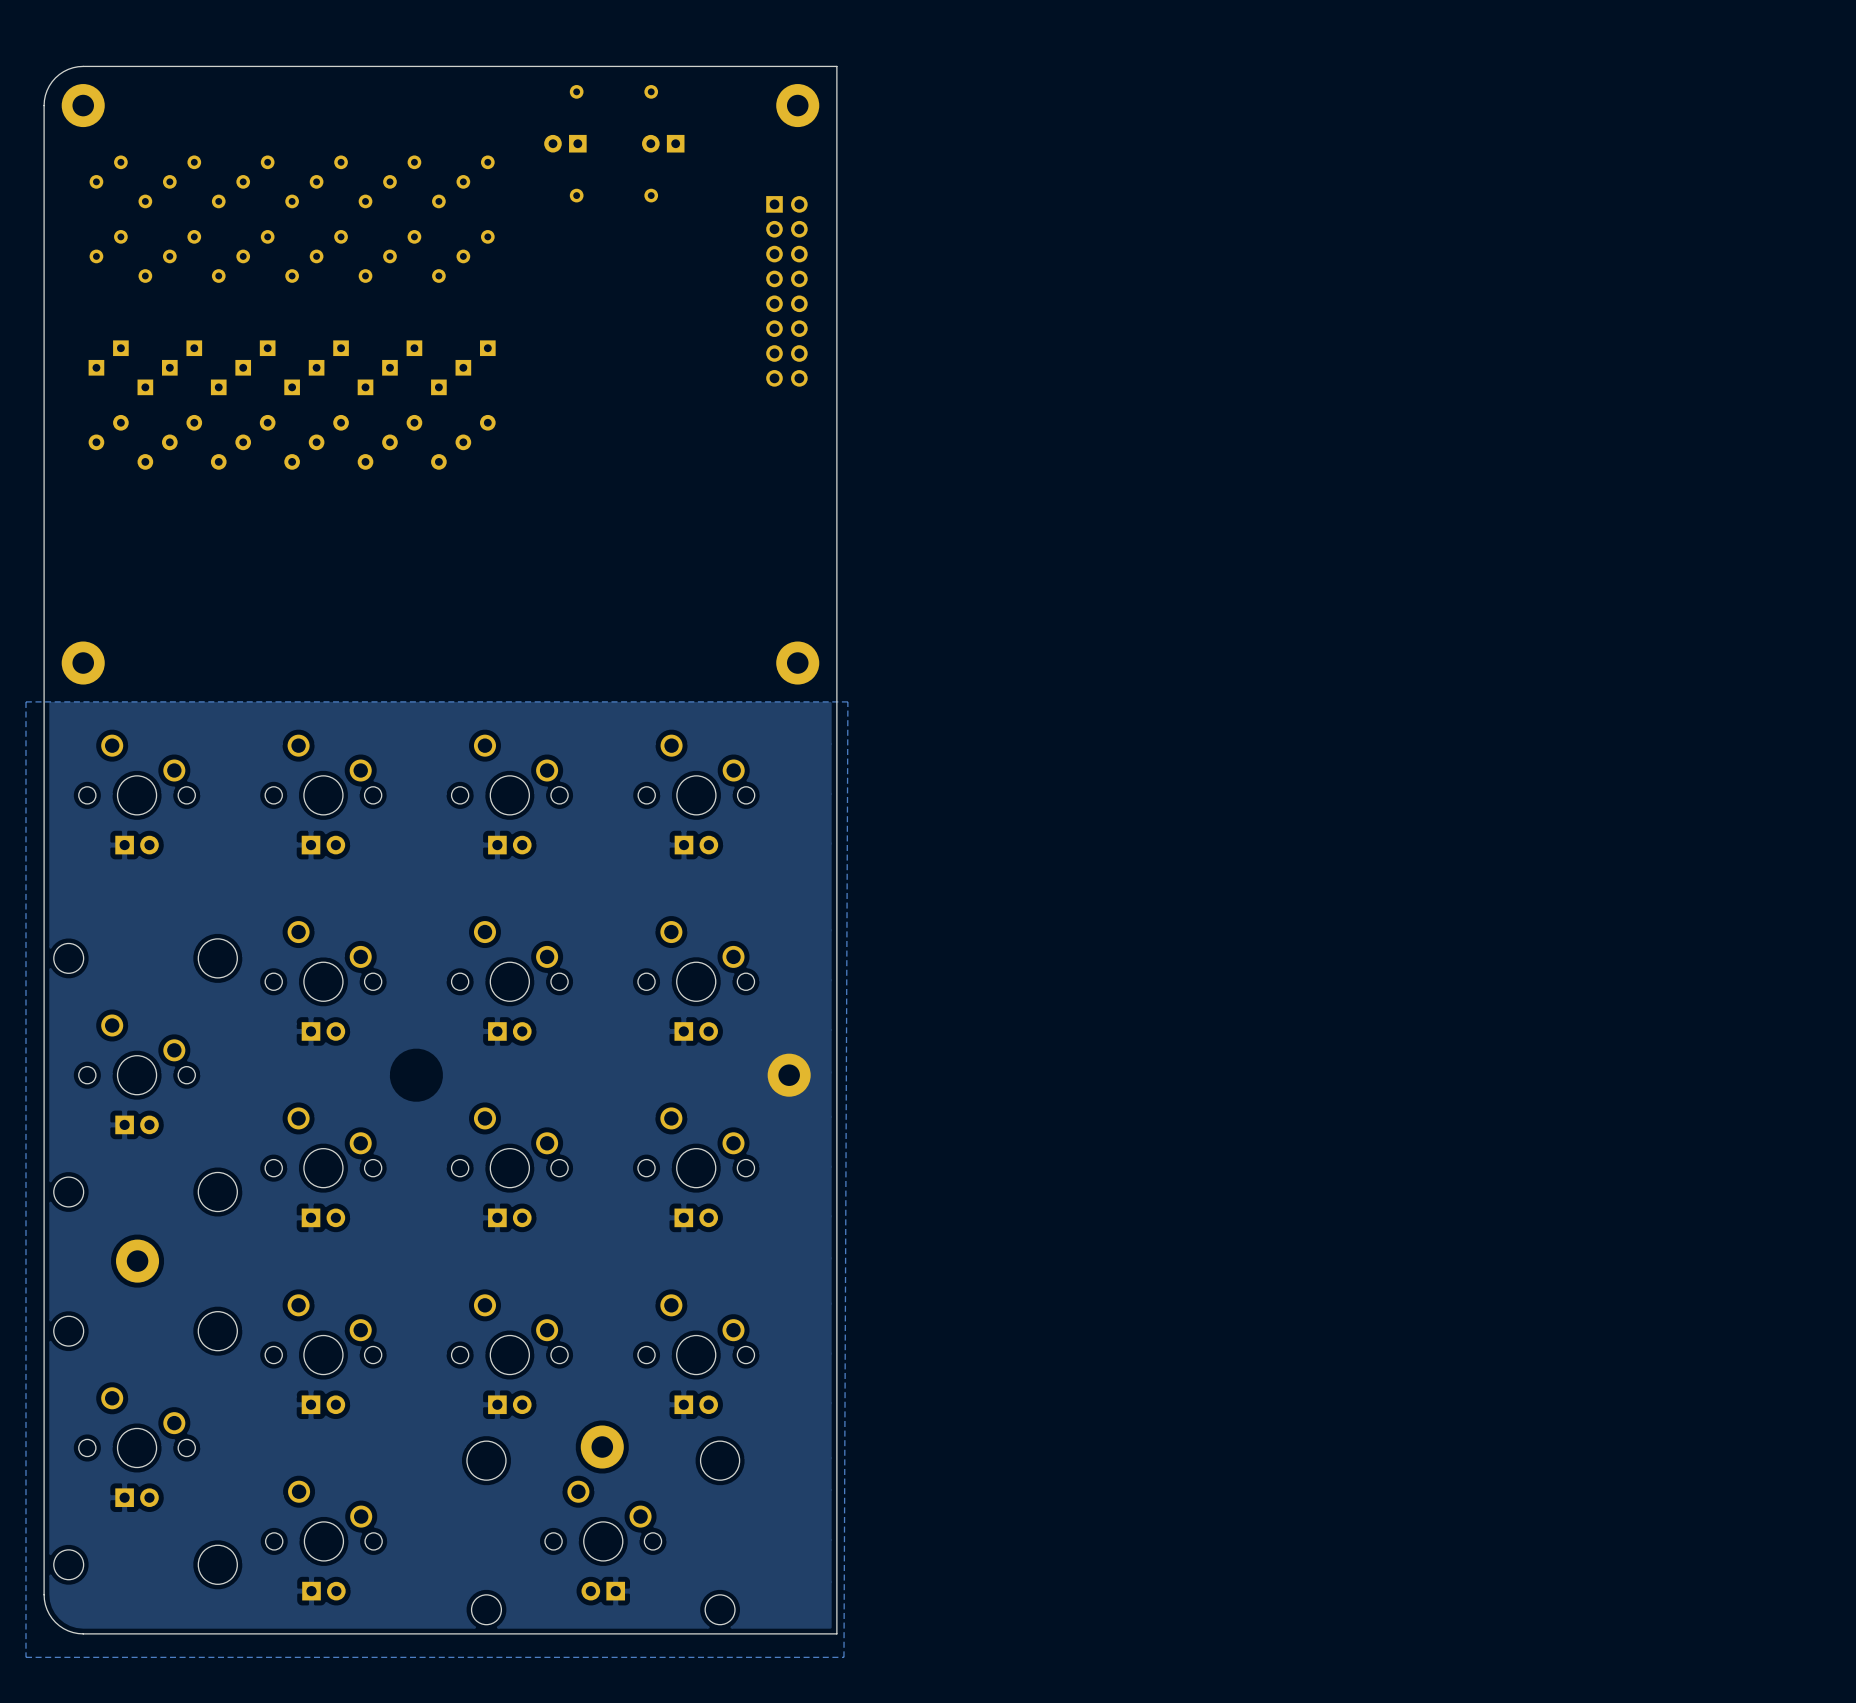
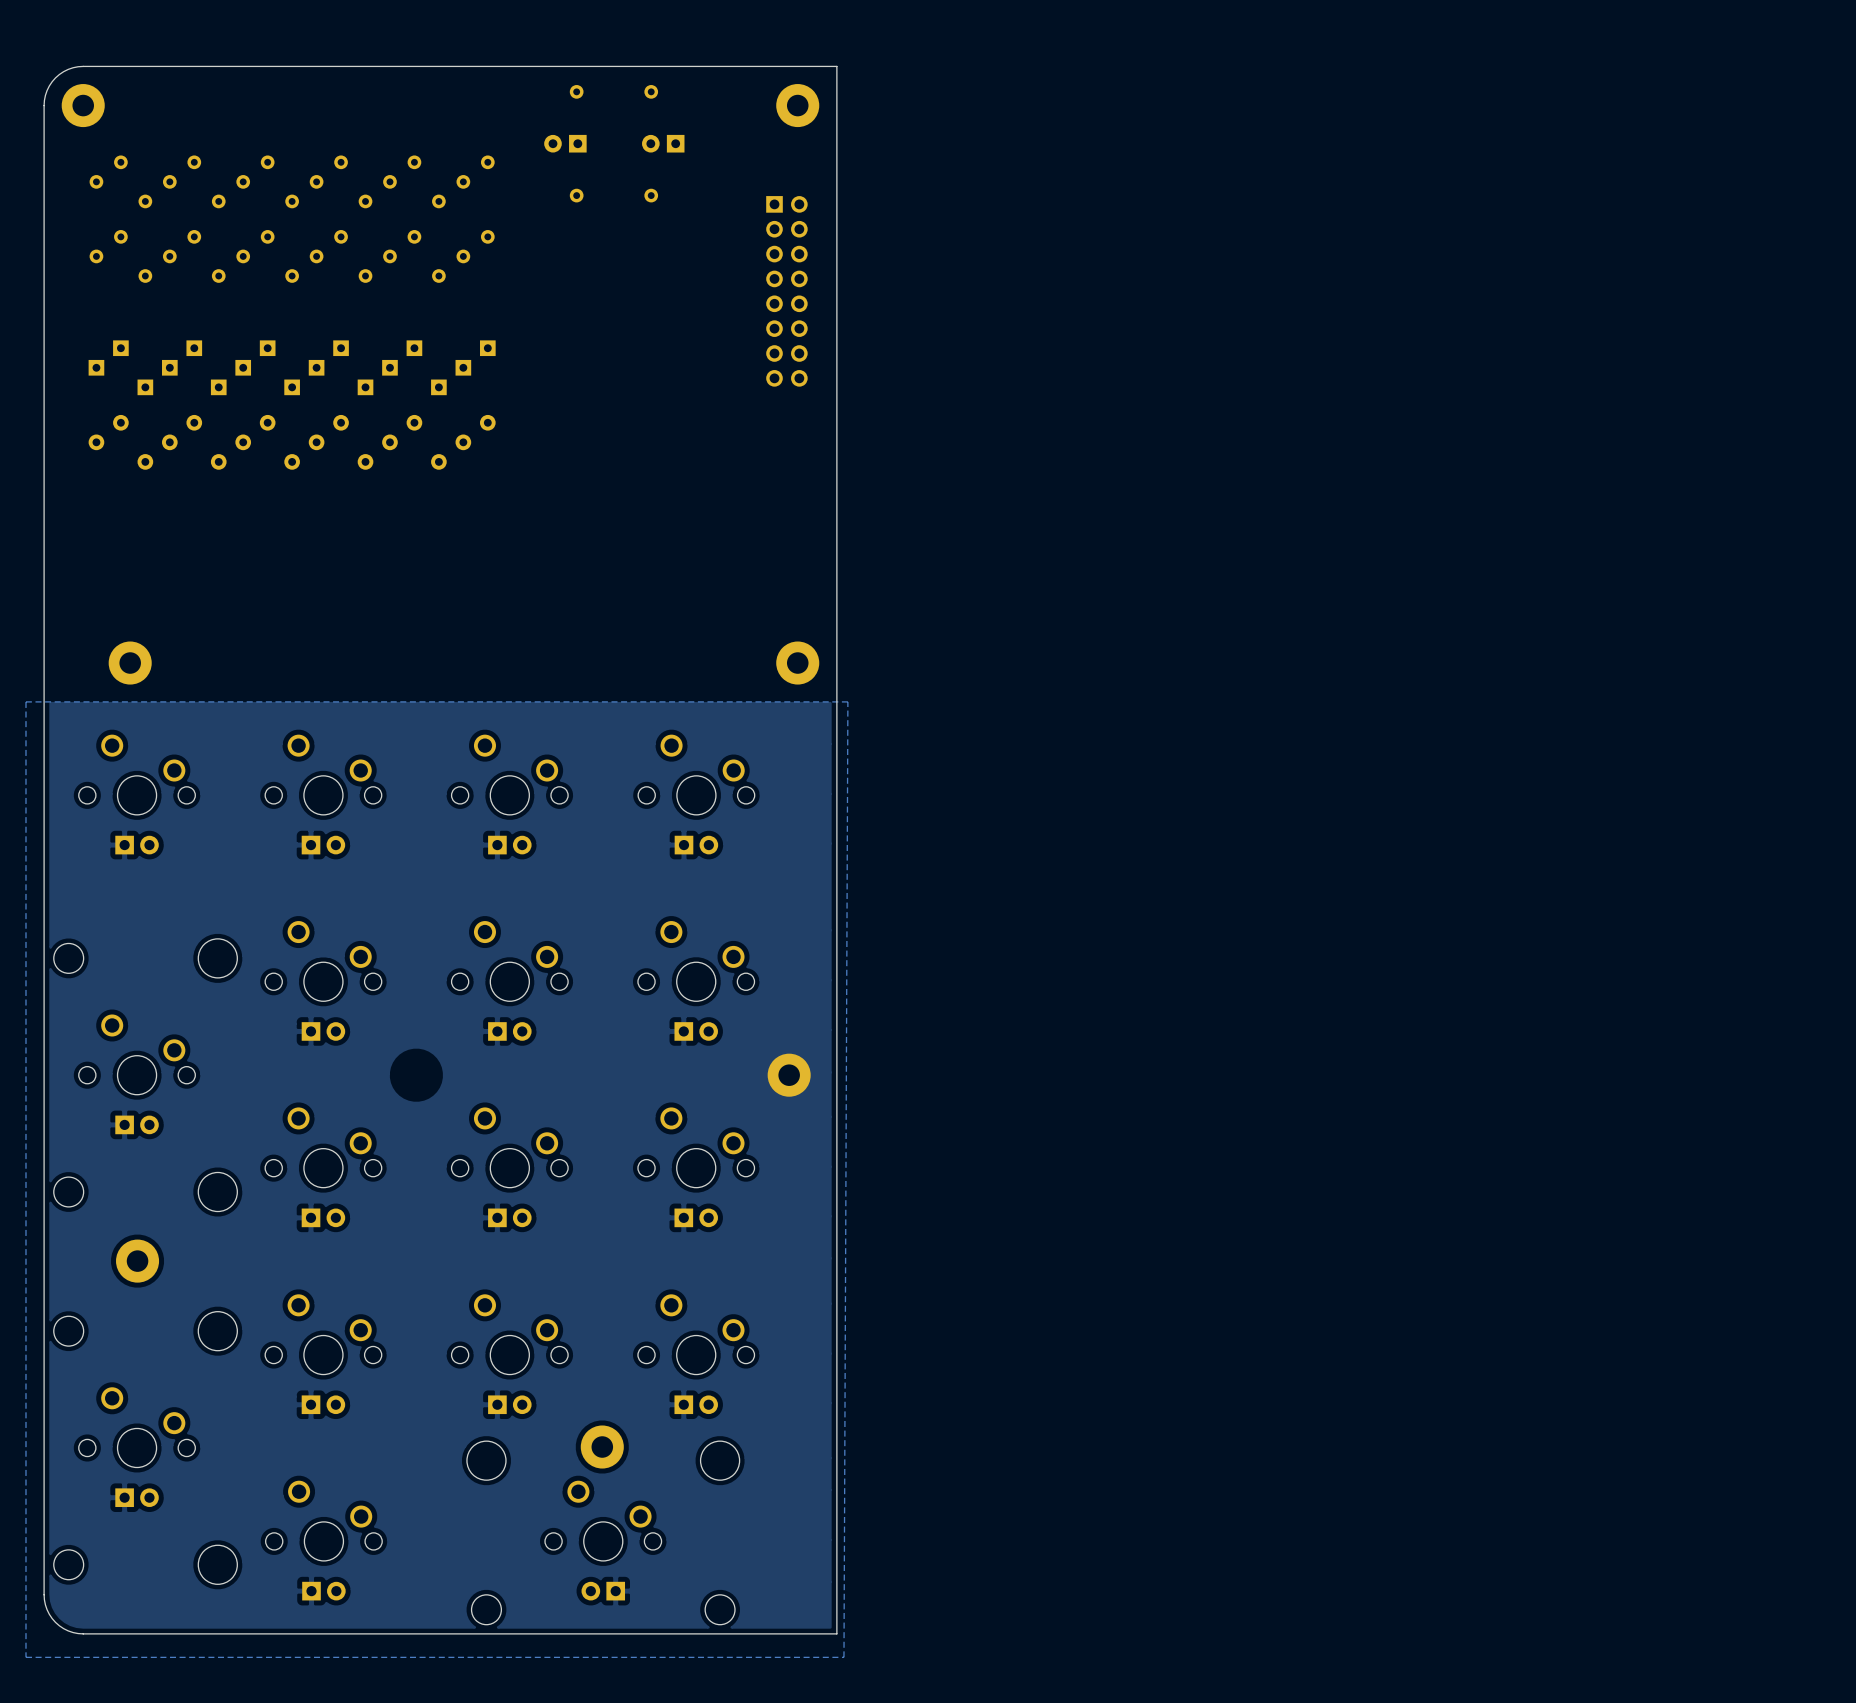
part position: (83, 663) -> (130, 663)

